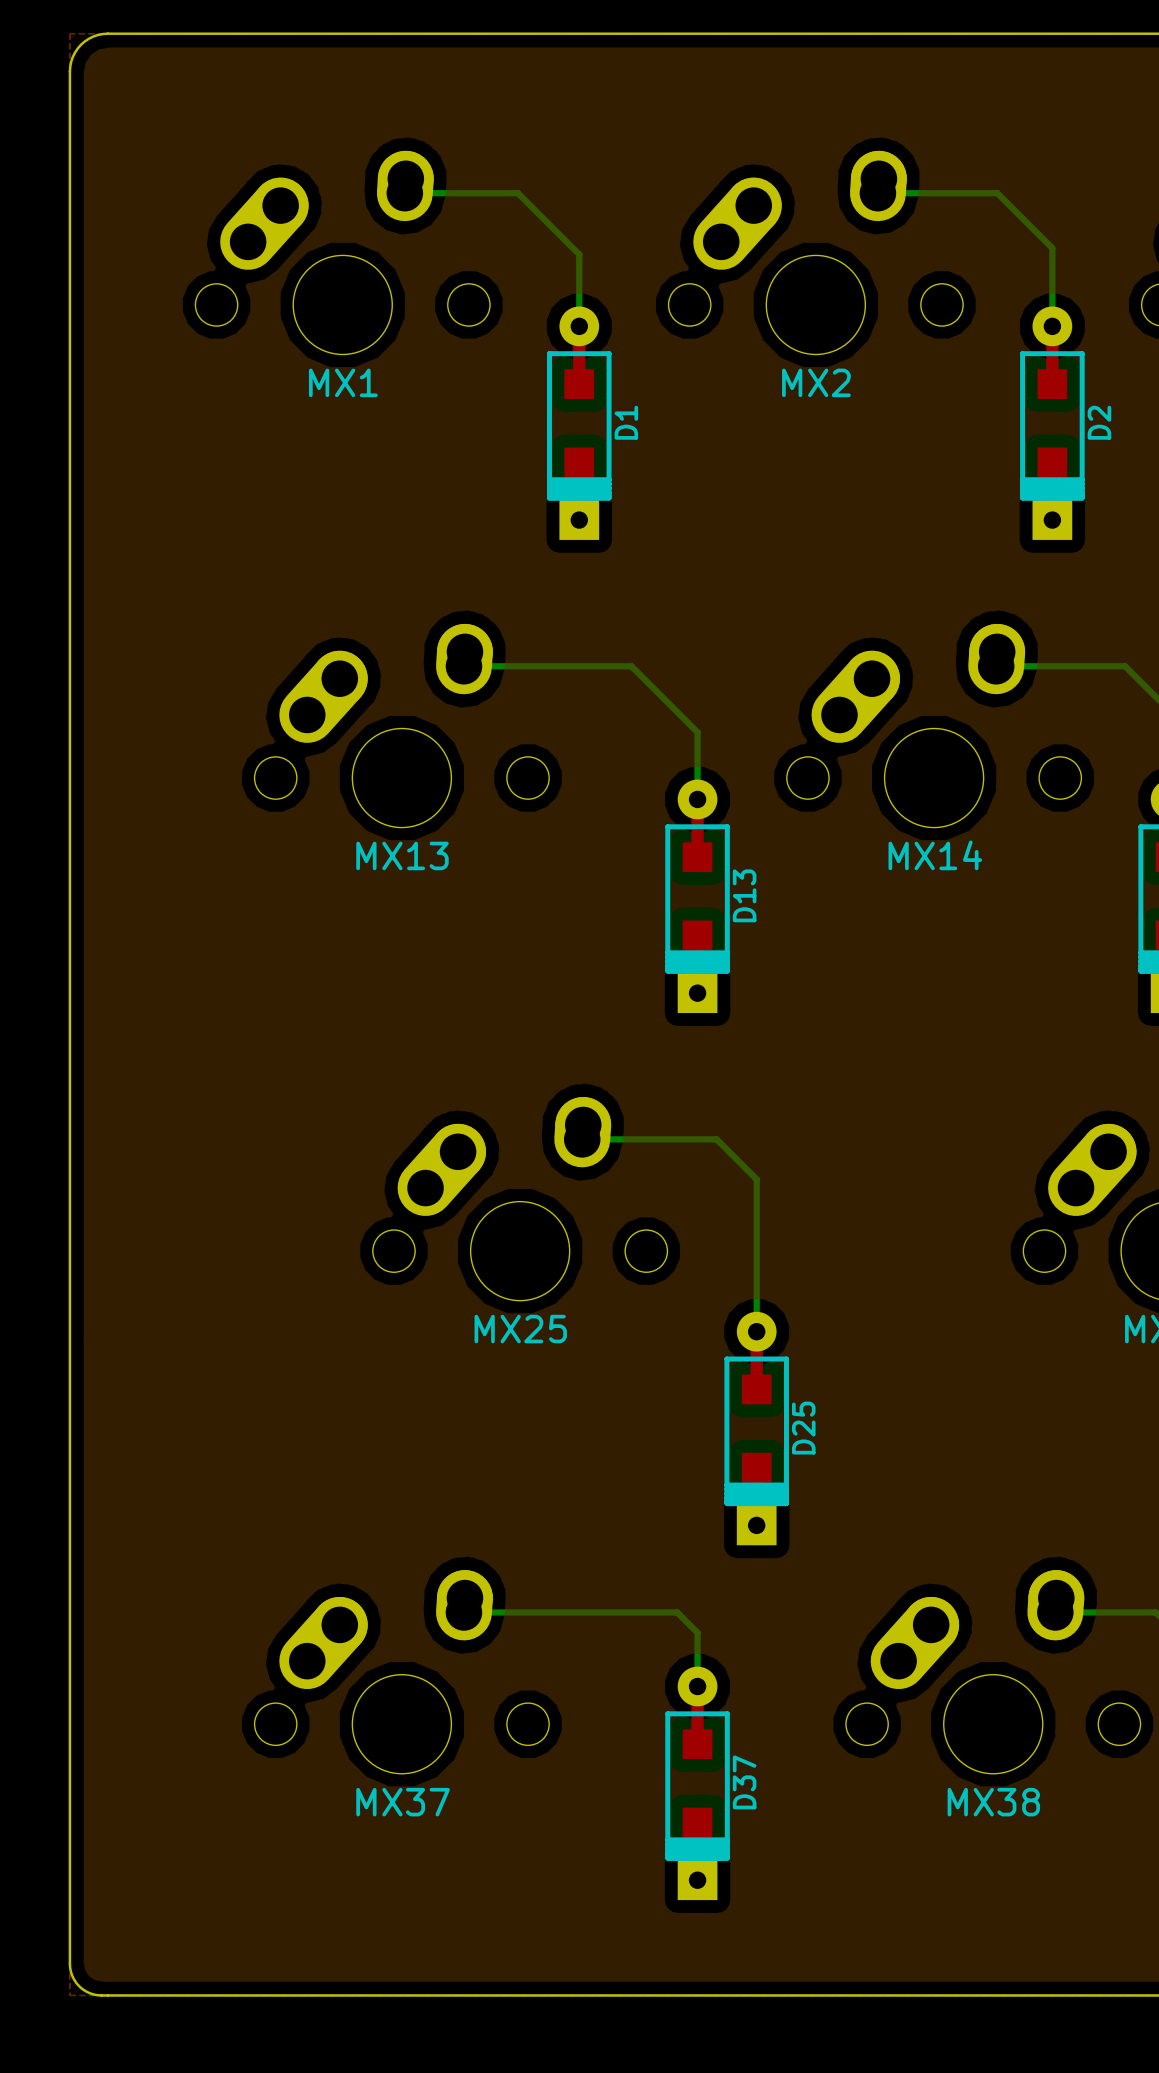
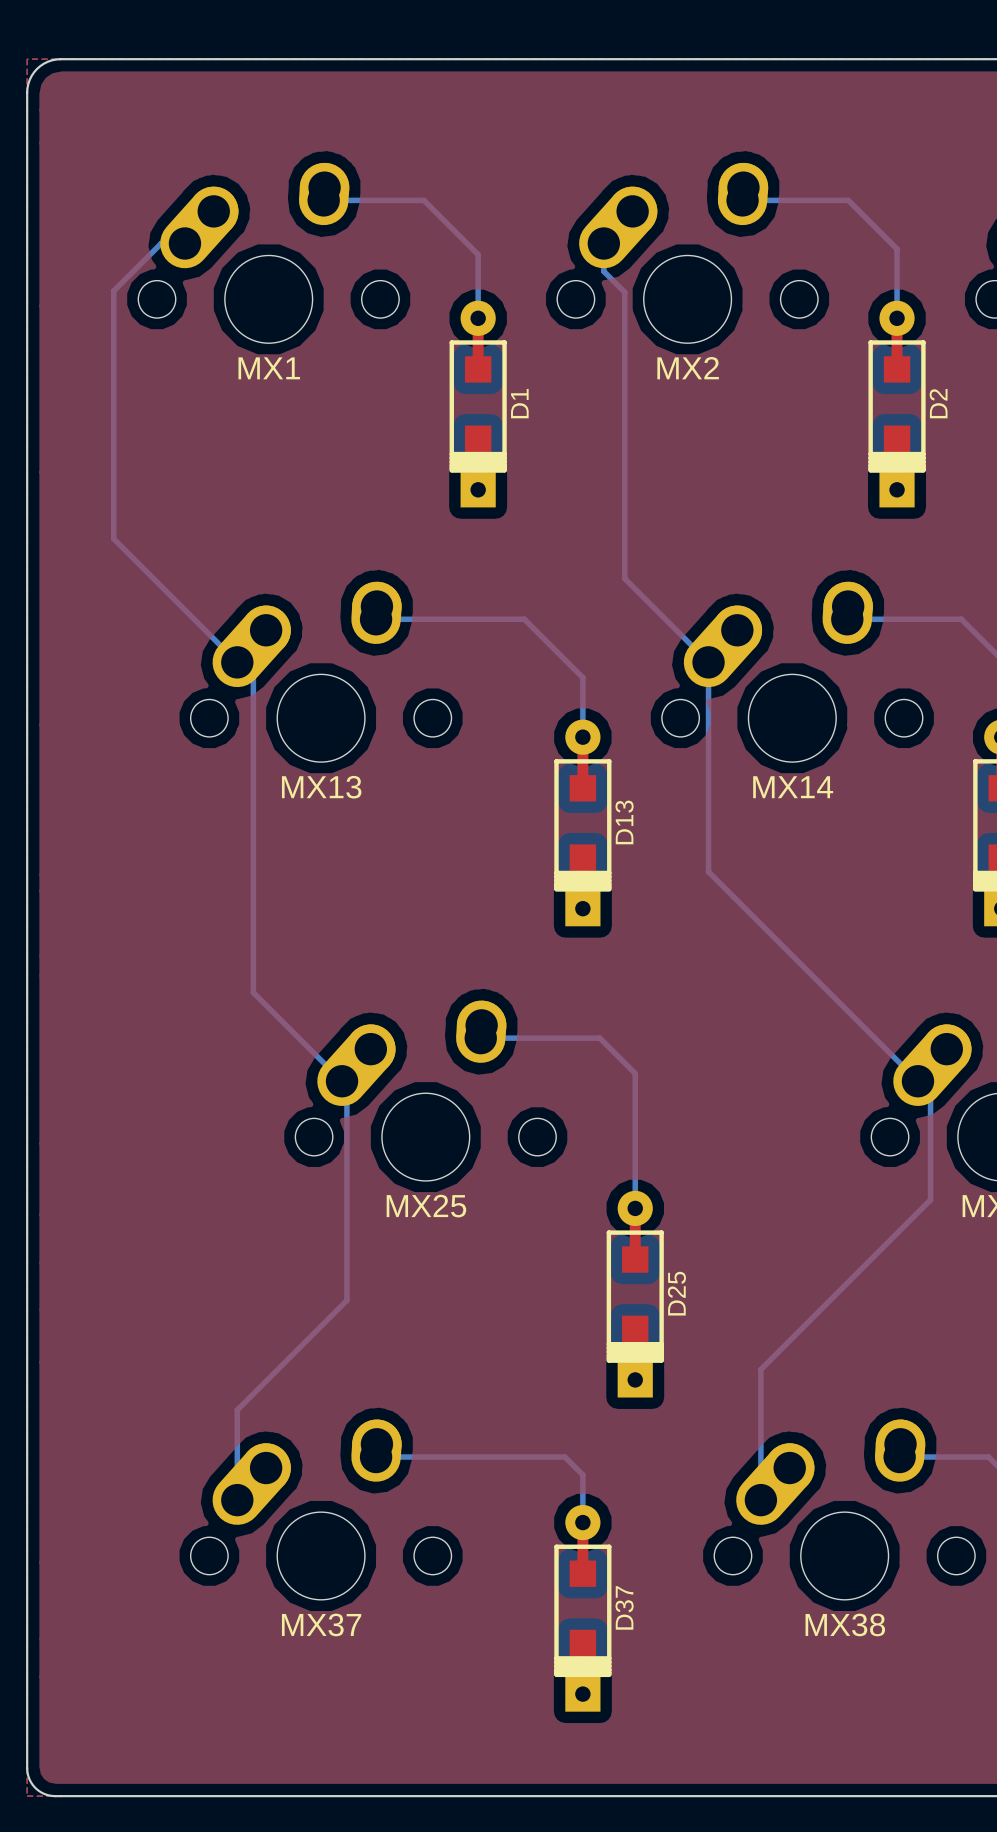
bottom track: none -> (184, 243) (161, 243) (113, 290) (113, 538) (253, 678) (253, 992) (346, 1086) (346, 1300) (237, 1410) (237, 1500)
bottom track: none -> (603, 243) (603, 271) (624, 292) (624, 578) (708, 662) (708, 871) (930, 1093) (930, 1199) (760, 1369) (760, 1500)

